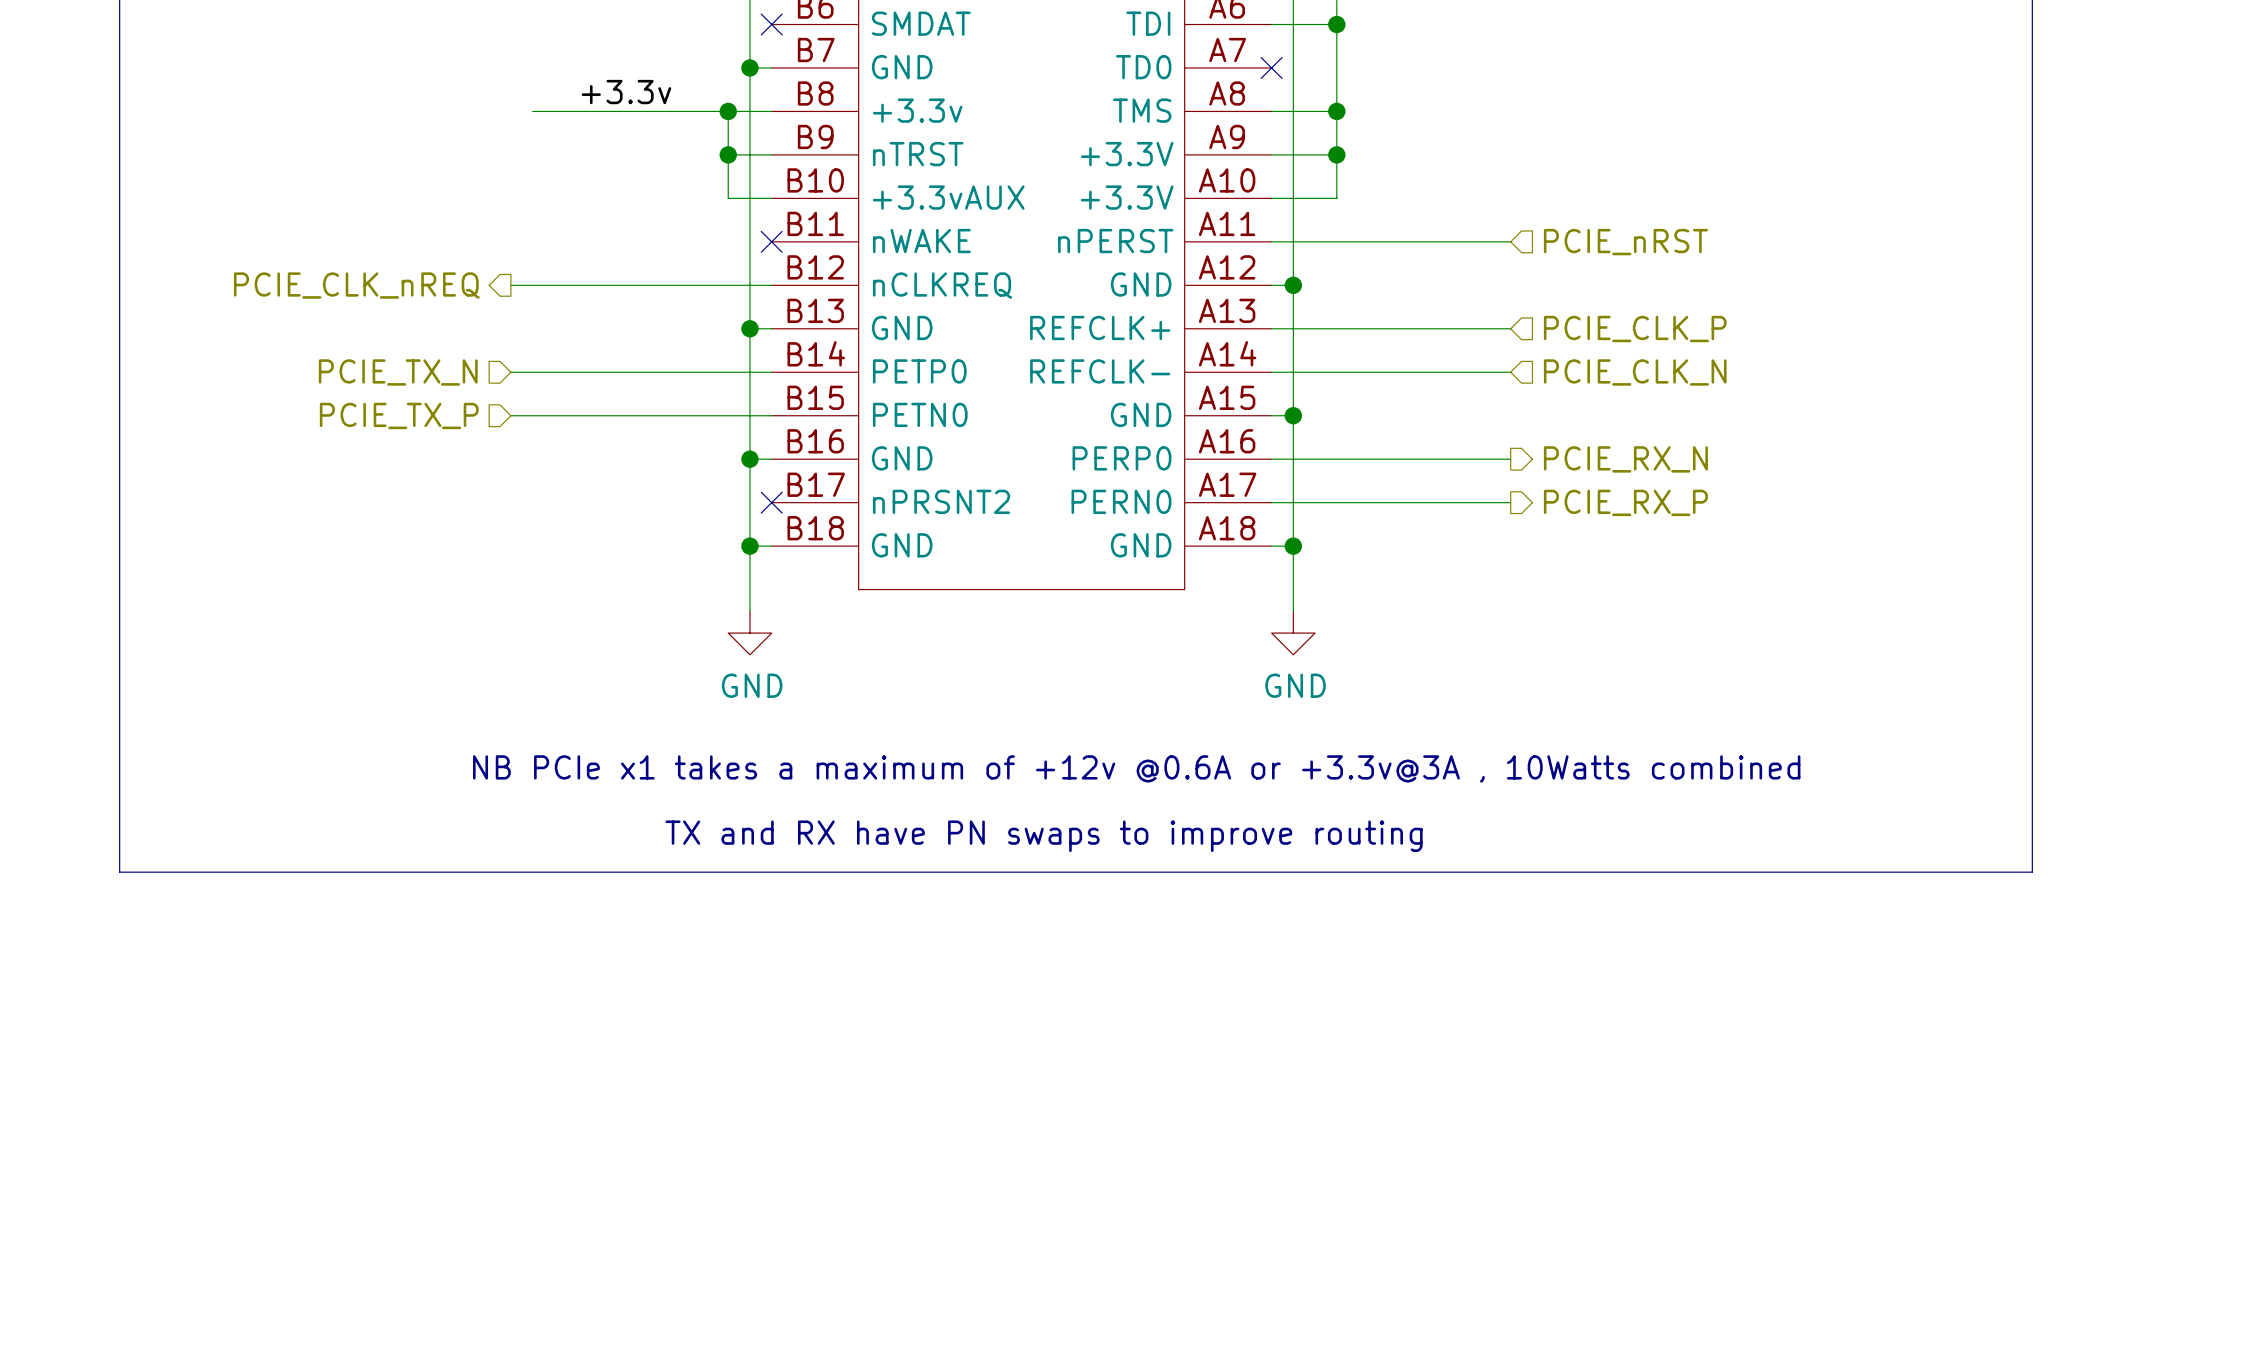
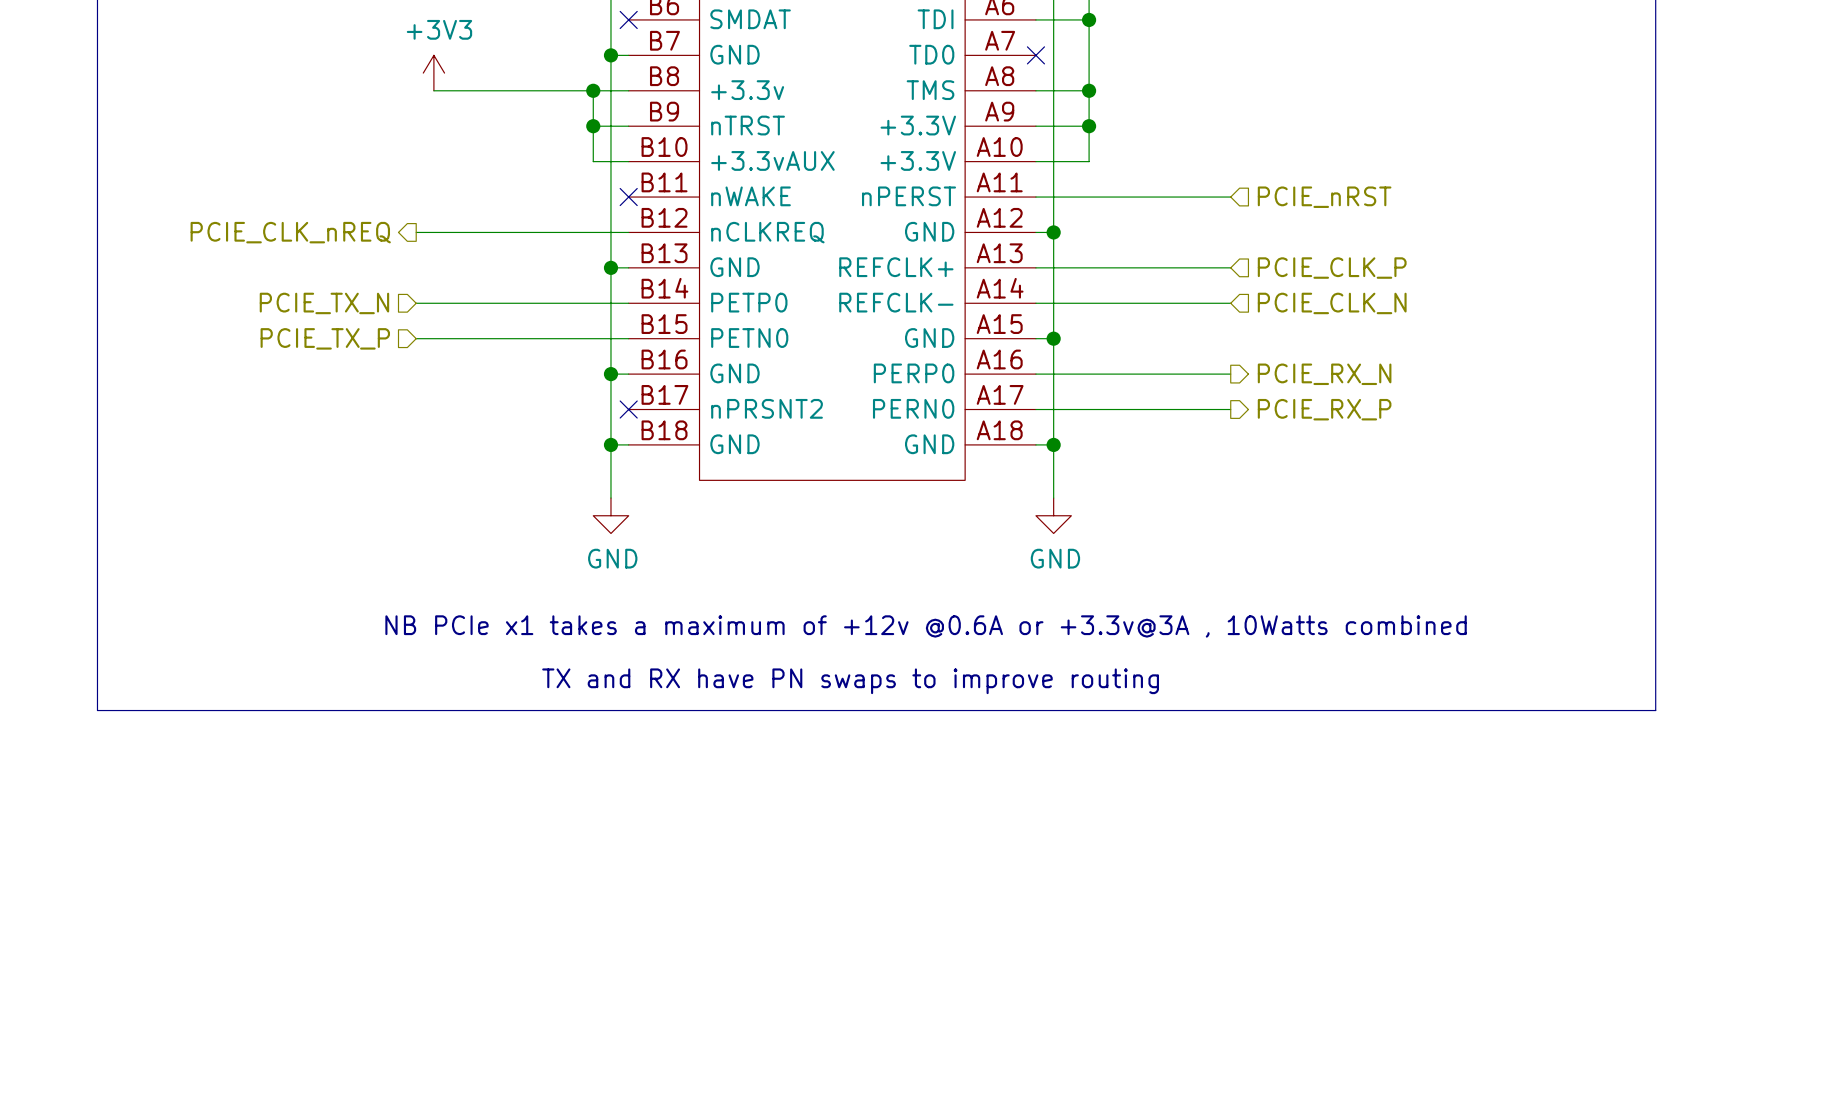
power symbol: none -> +3V3 (433, 73)
label: +3.3v (626, 92) -> none

